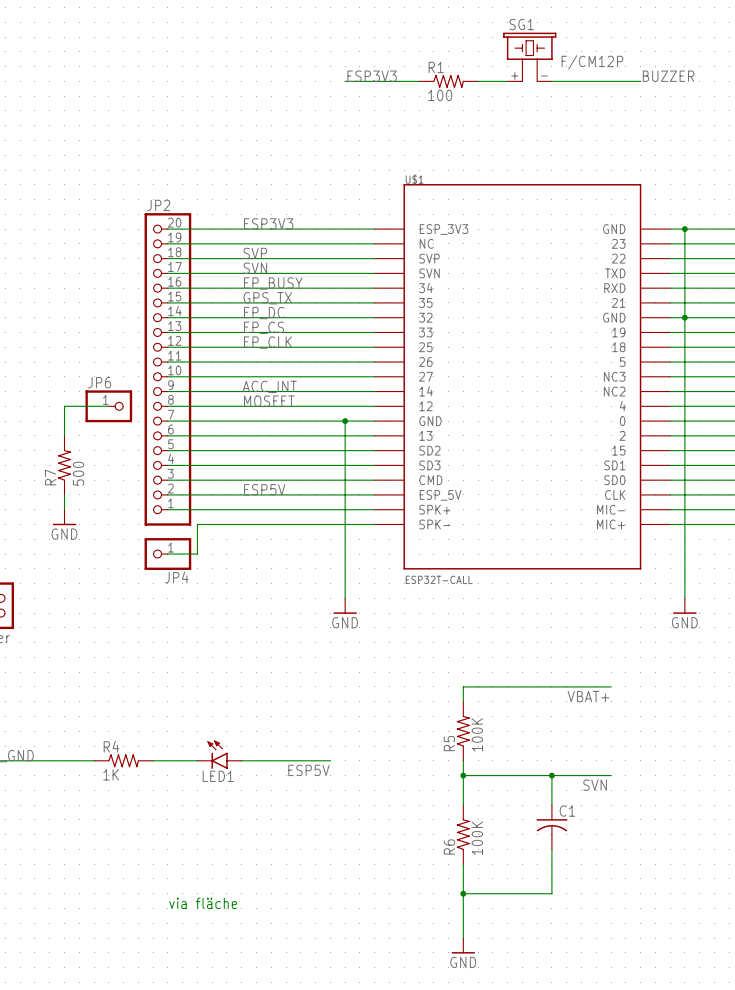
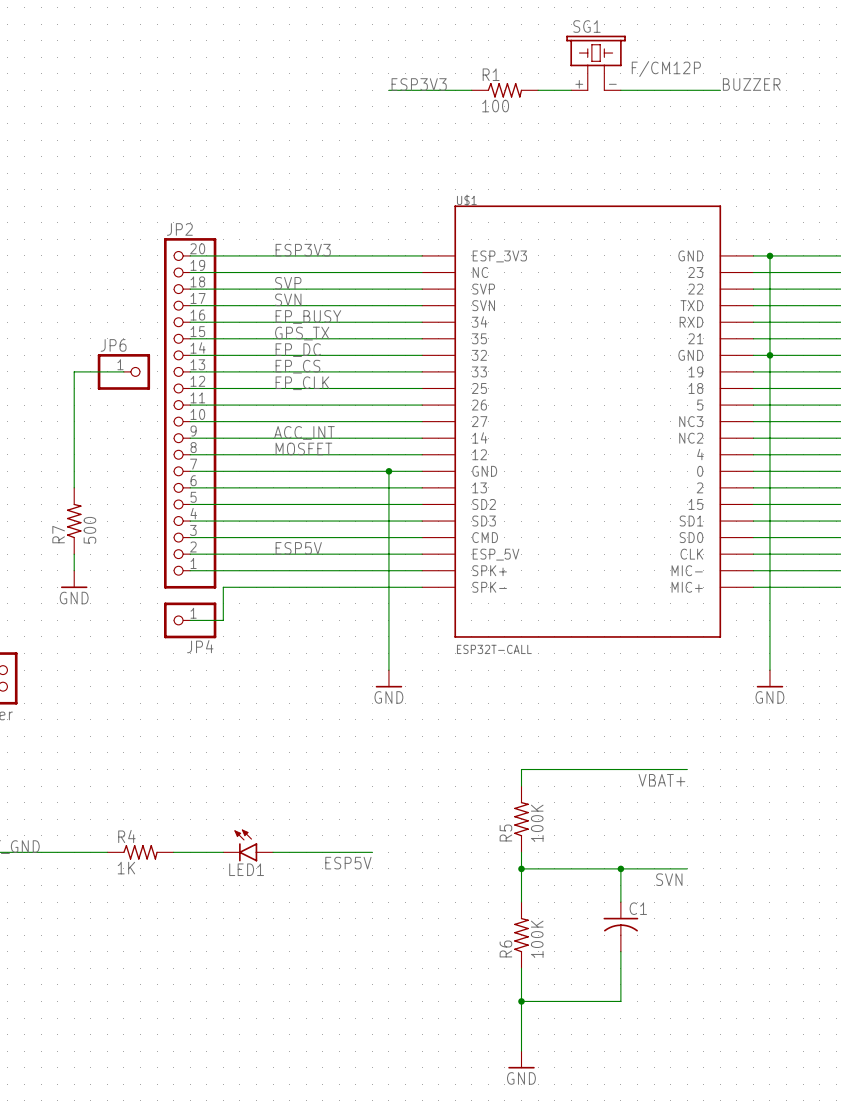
wire: (64, 406) (108, 406) -> (74, 454) (74, 371) (123, 371)
JP6 position: (108, 406) -> (123, 371)
text: via fläche (203, 903) -> none

